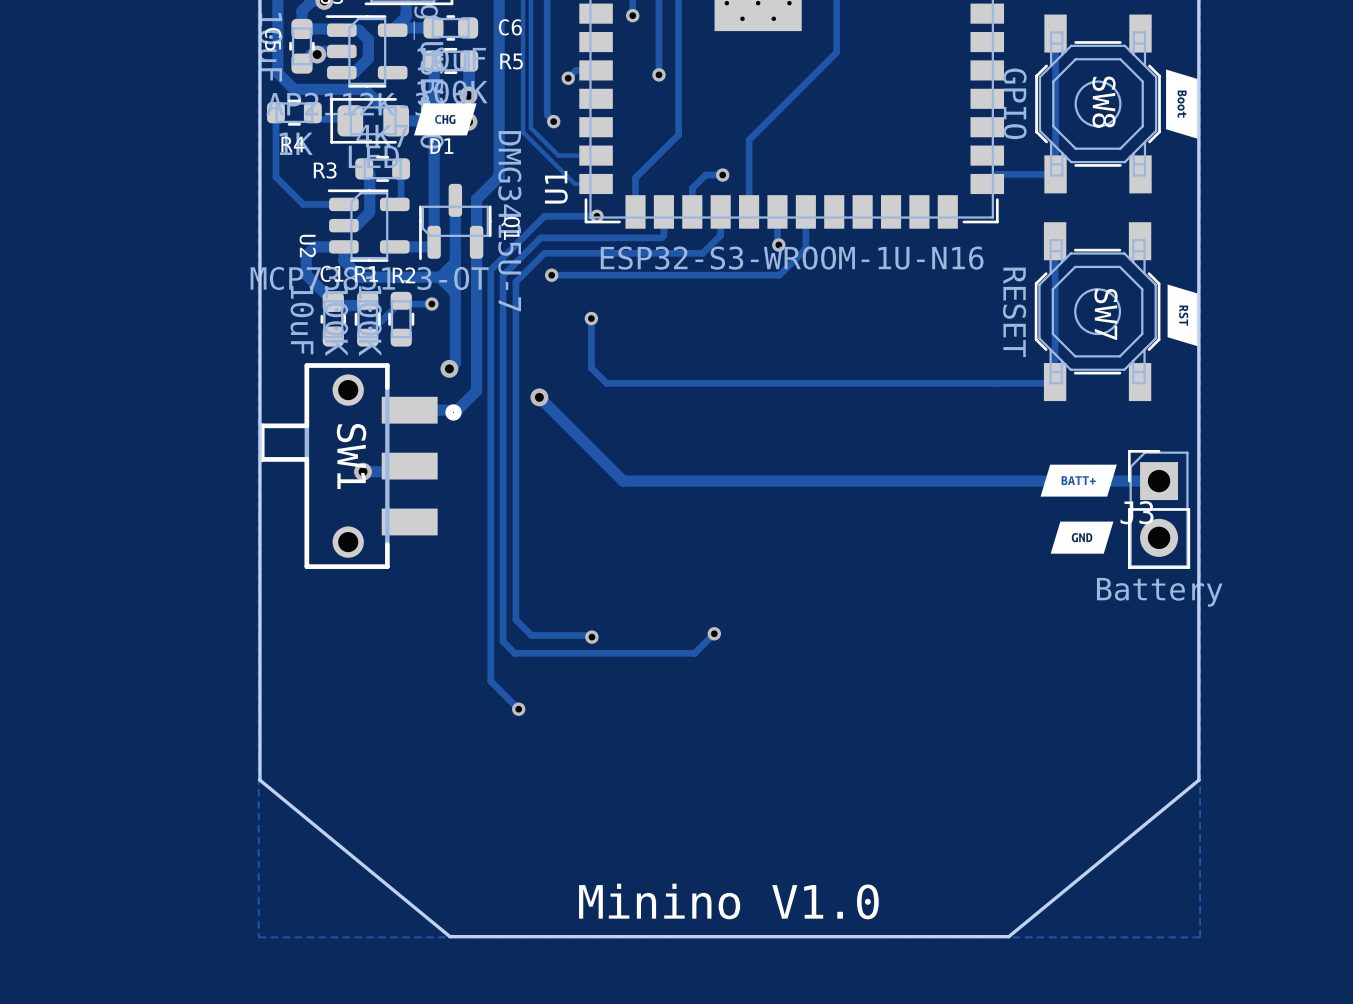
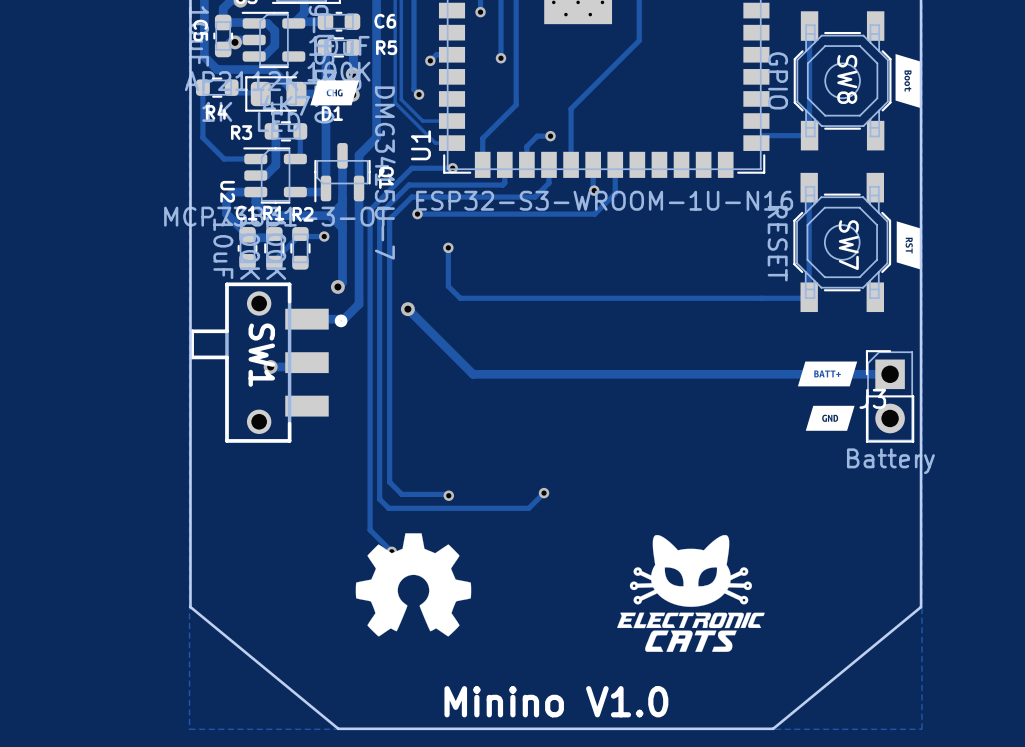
drawing: none -> [355, 533, 472, 637]
drawing: none -> [617, 535, 765, 652]

